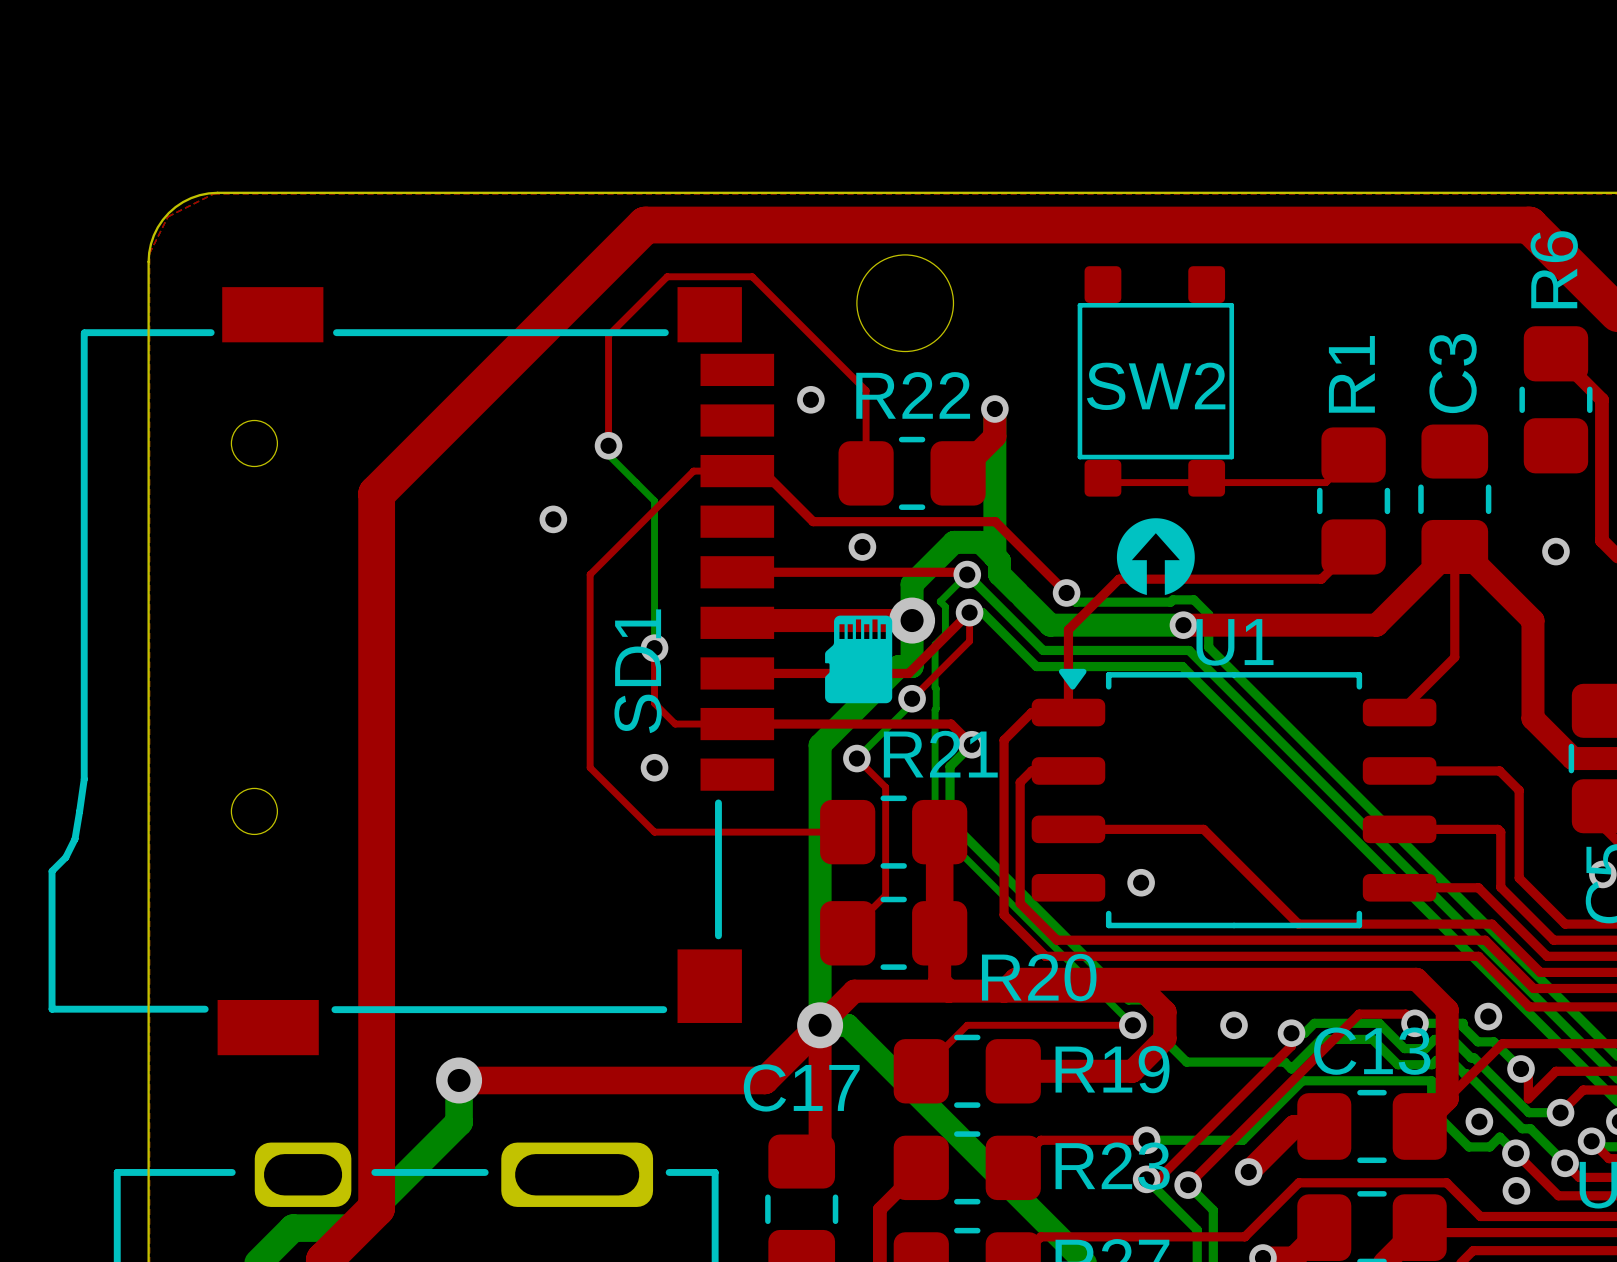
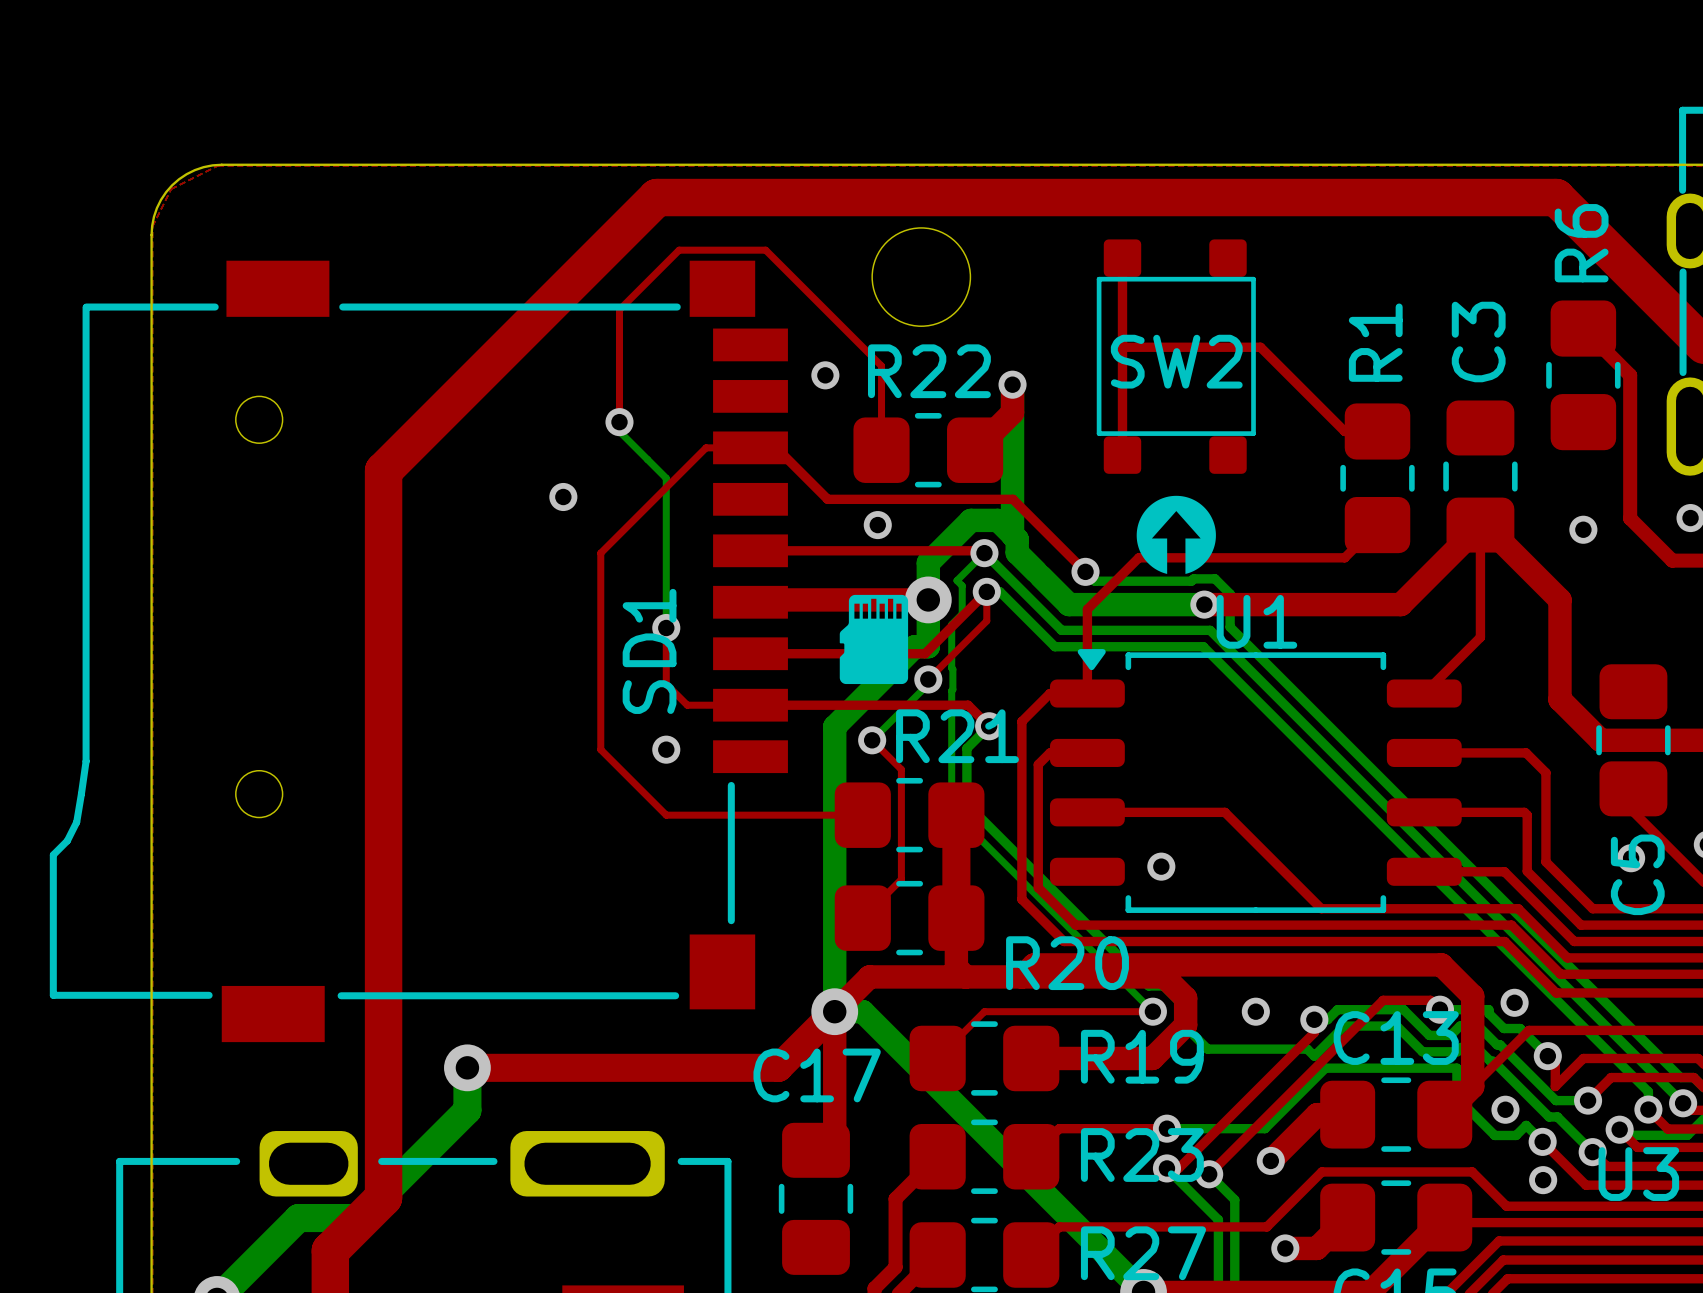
top track: none -> (1122, 258) (1122, 455)
top track: (1353, 454) (1326, 482) (1102, 482) -> (1377, 431) (1344, 431) (1260, 347) (1124, 347) (1122, 344)

